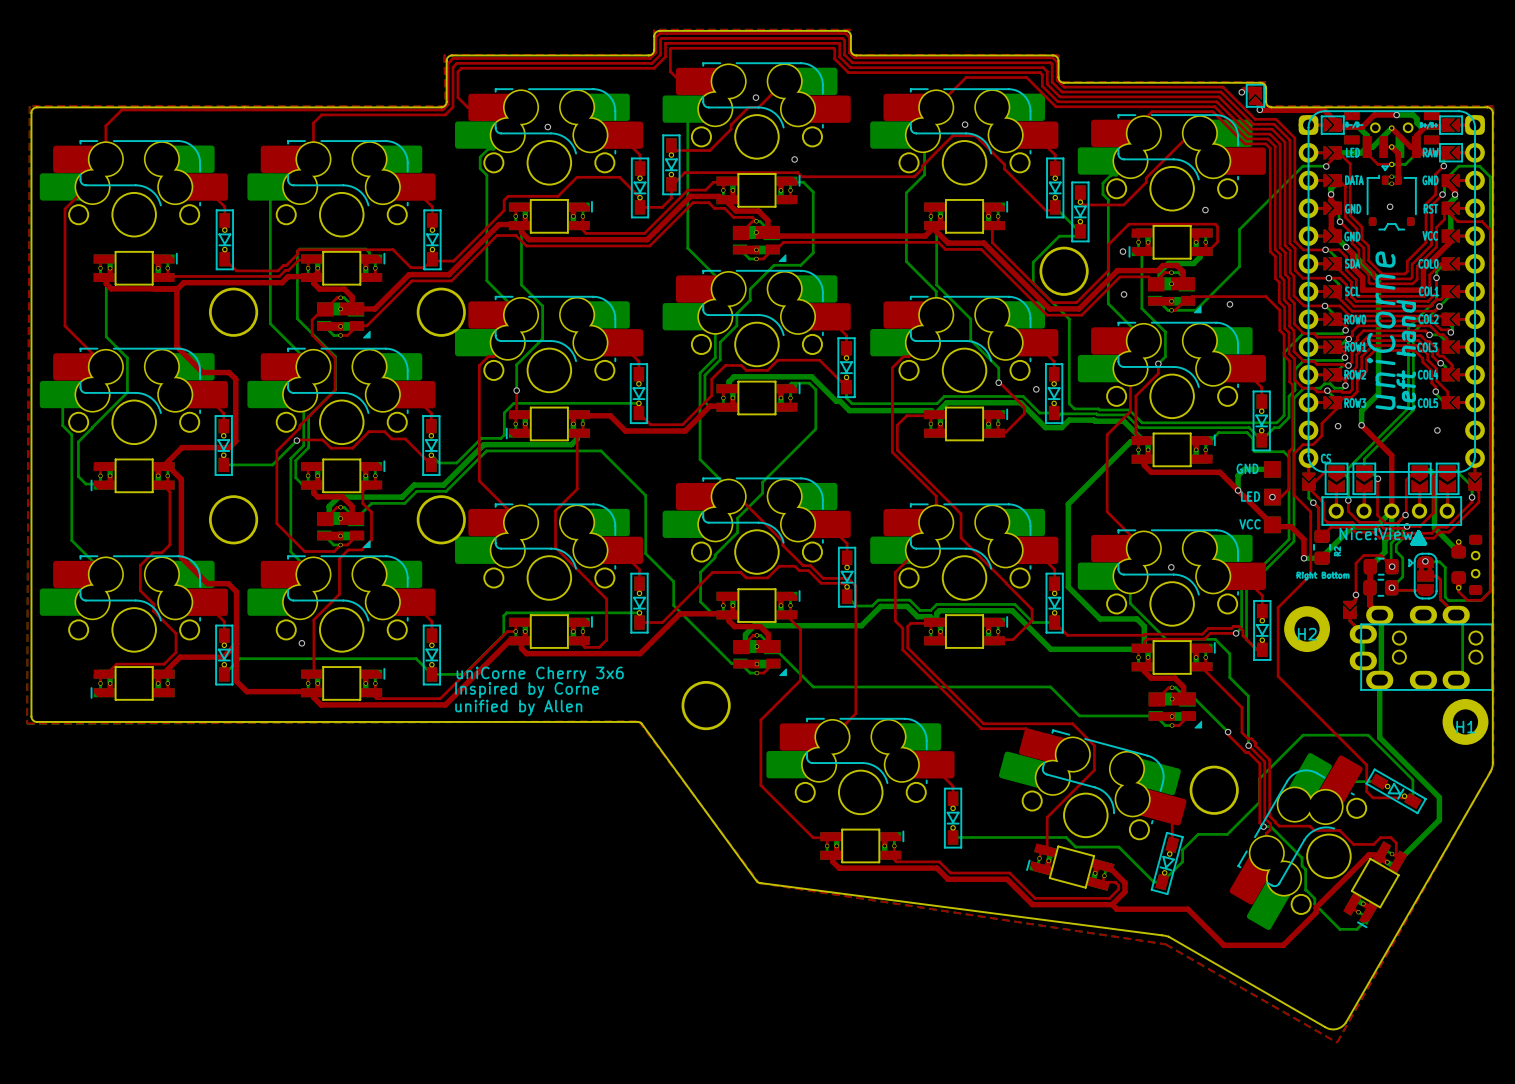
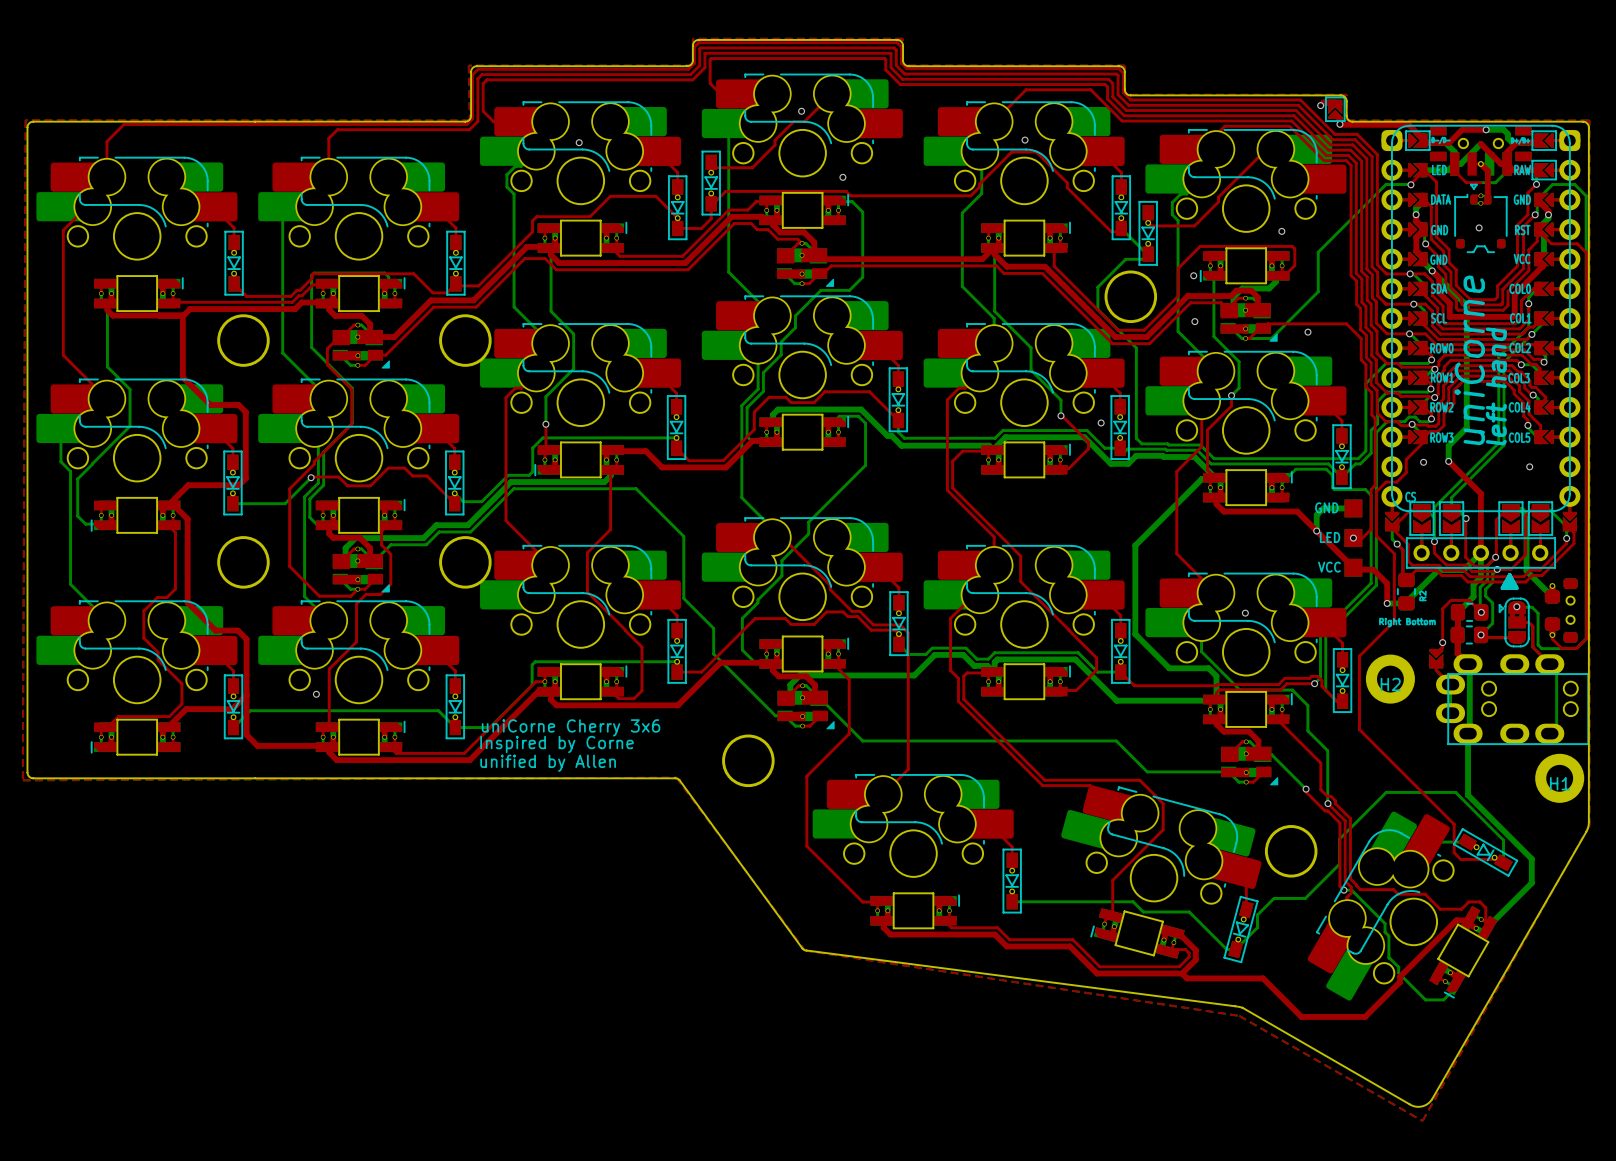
part footprint: [1344, 111, 1440, 168] -> [1430, 125, 1532, 176]
part text: Nice!View (1376, 533) -> none

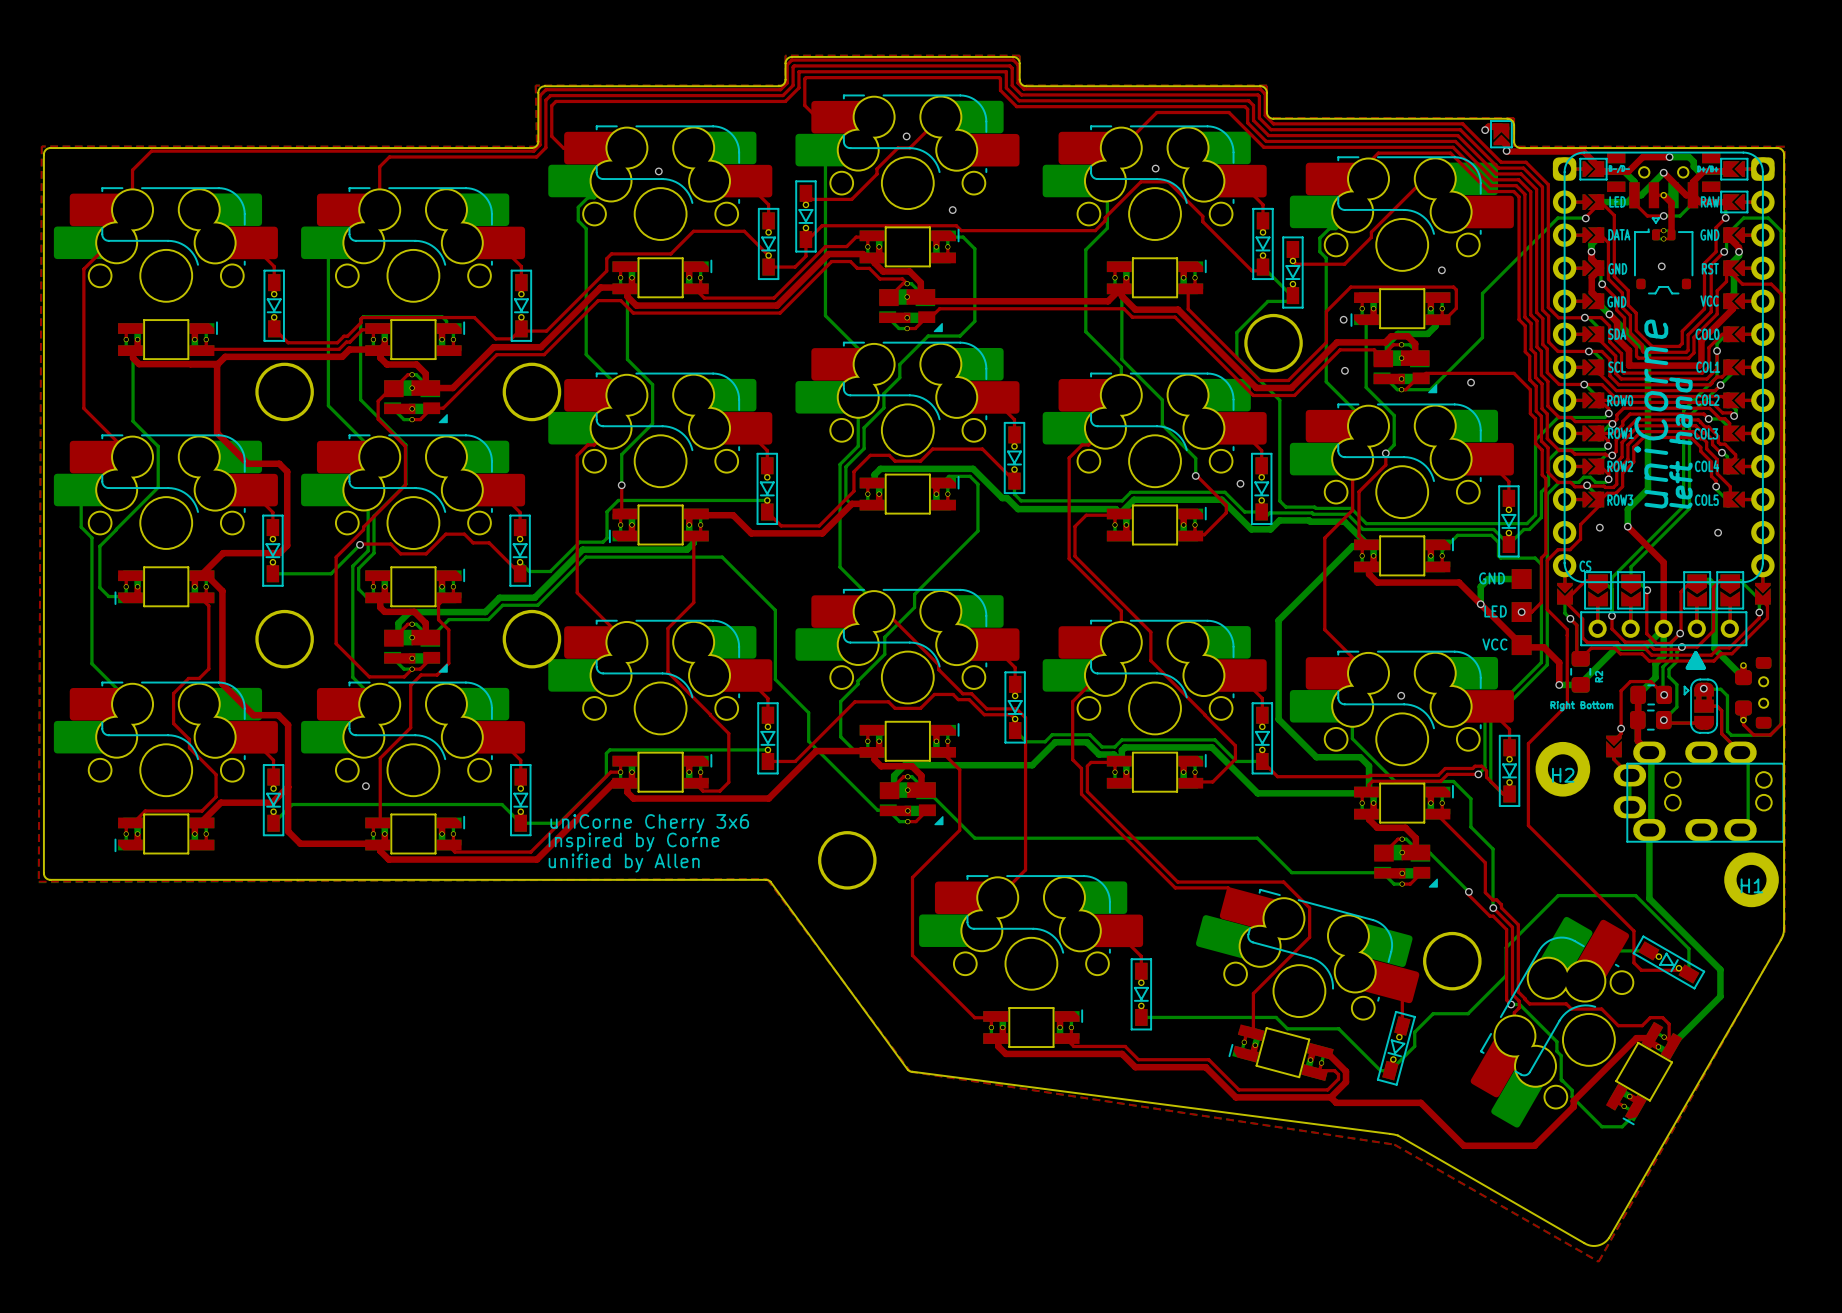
via: none -> (1663, 172)
via: none -> (1663, 215)

